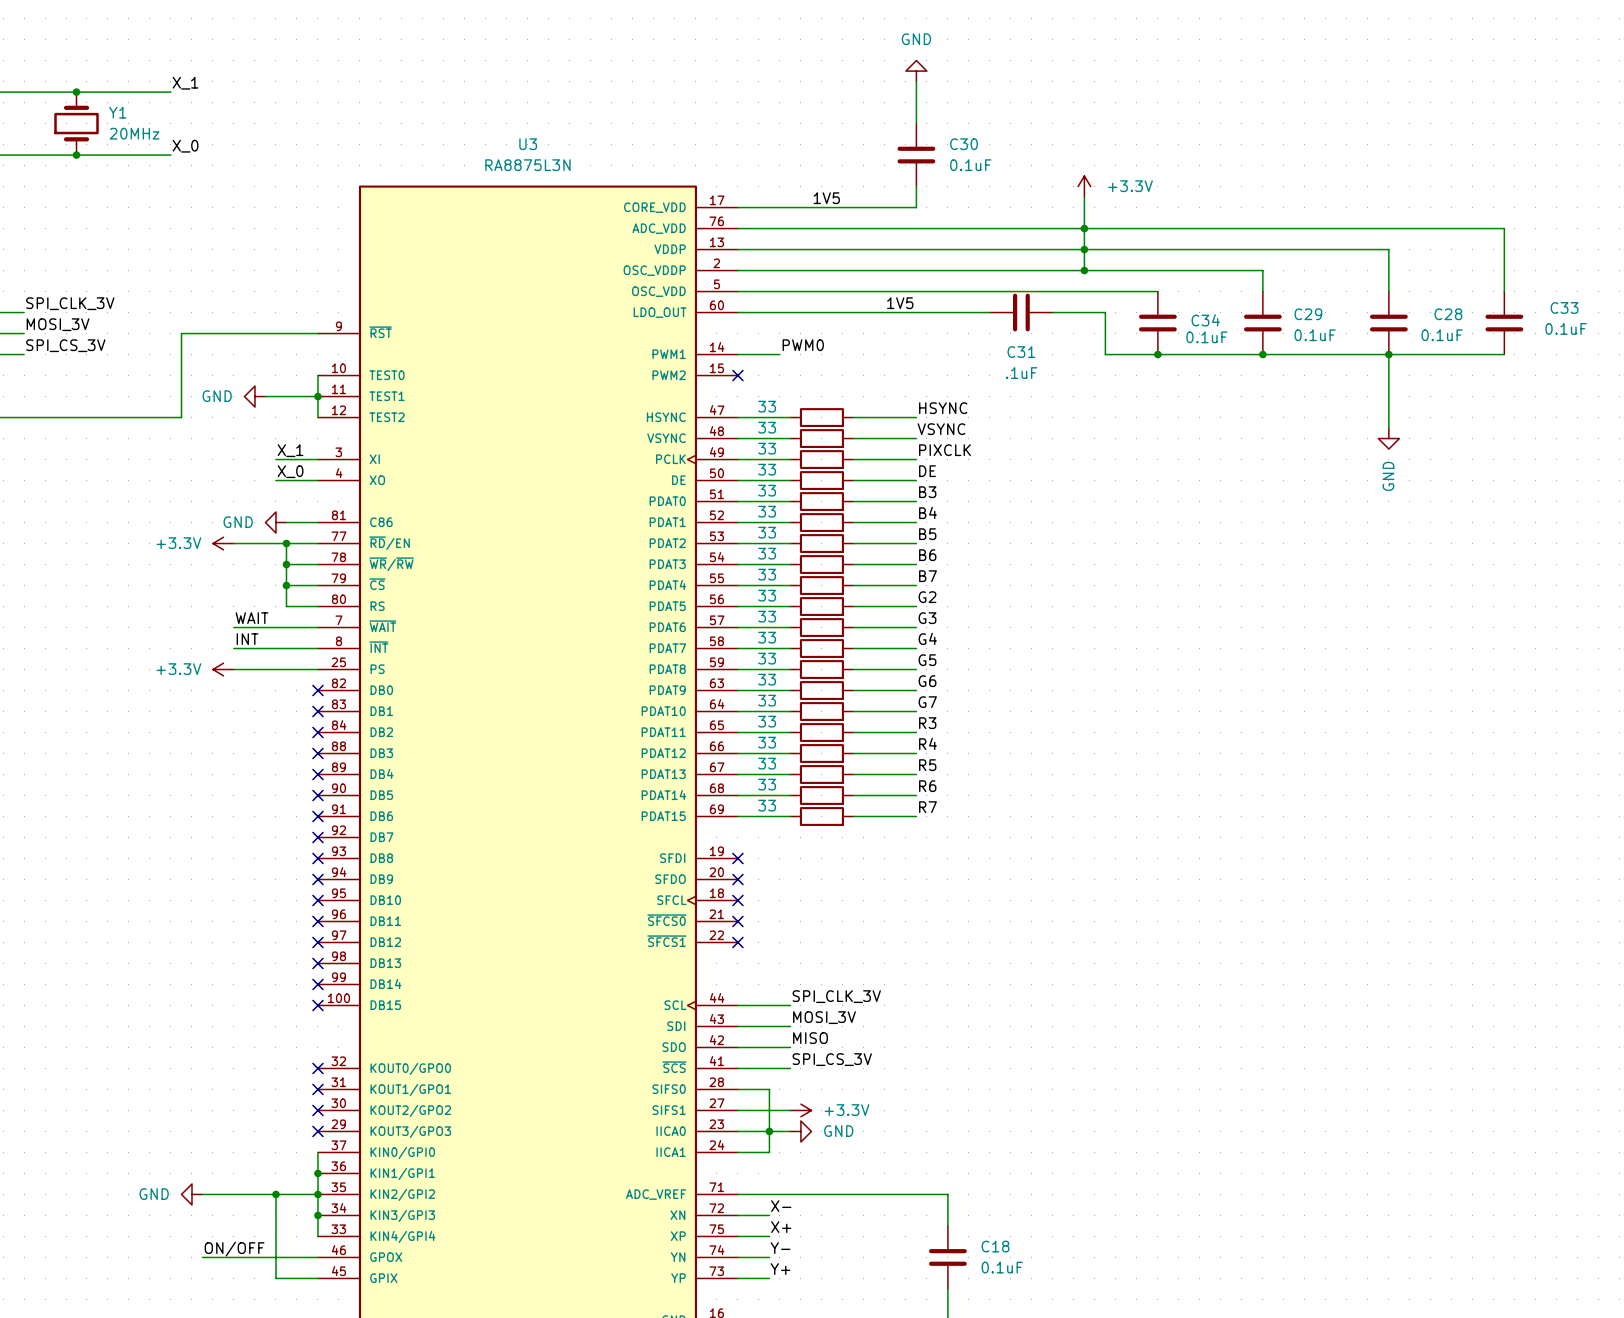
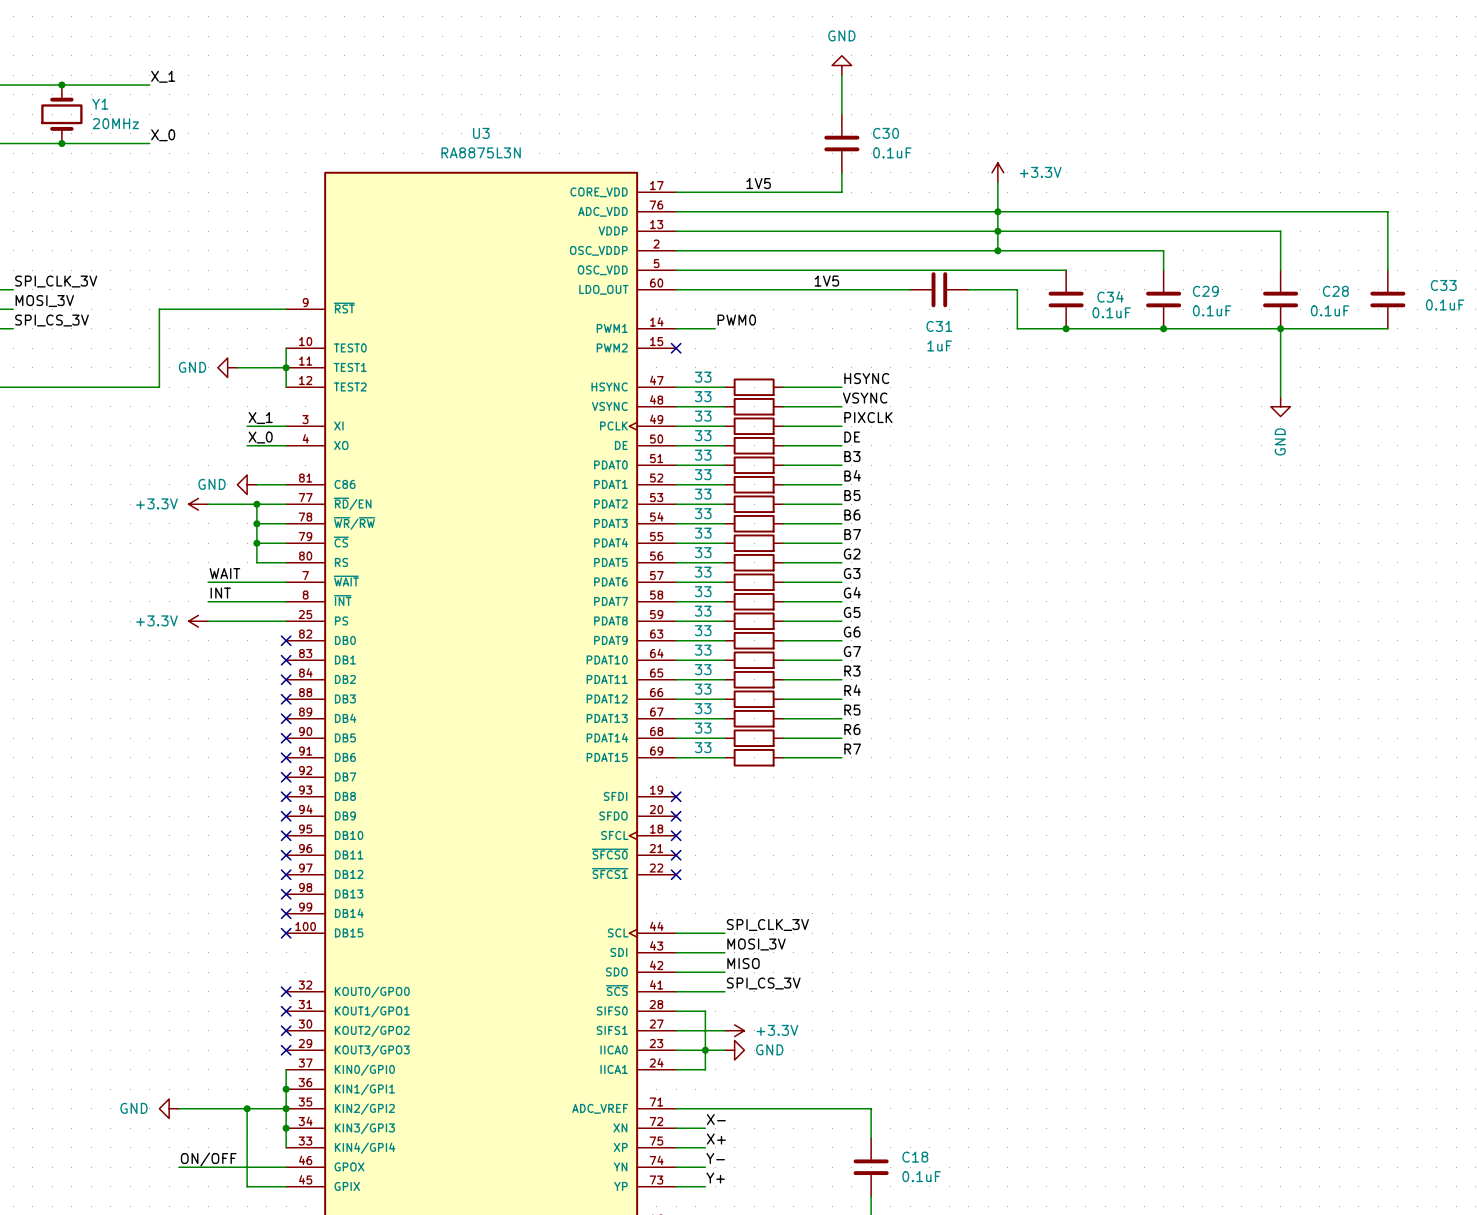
C31 value: .1uF (1021, 373) -> 1uF (939, 345)

